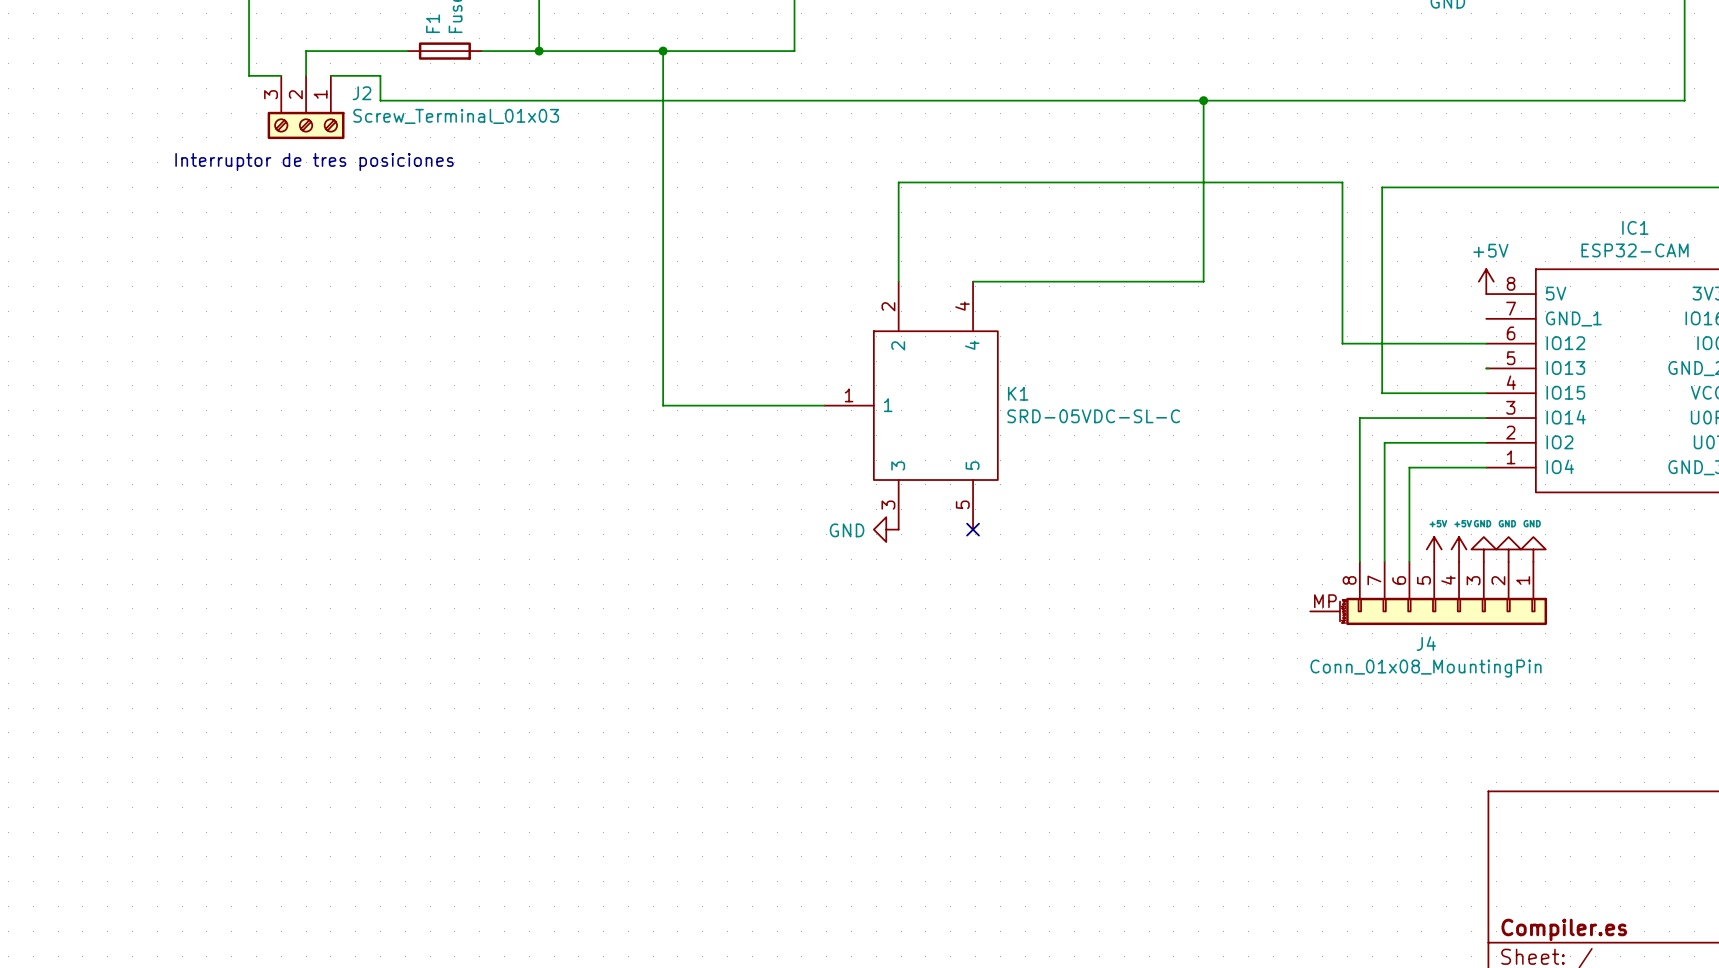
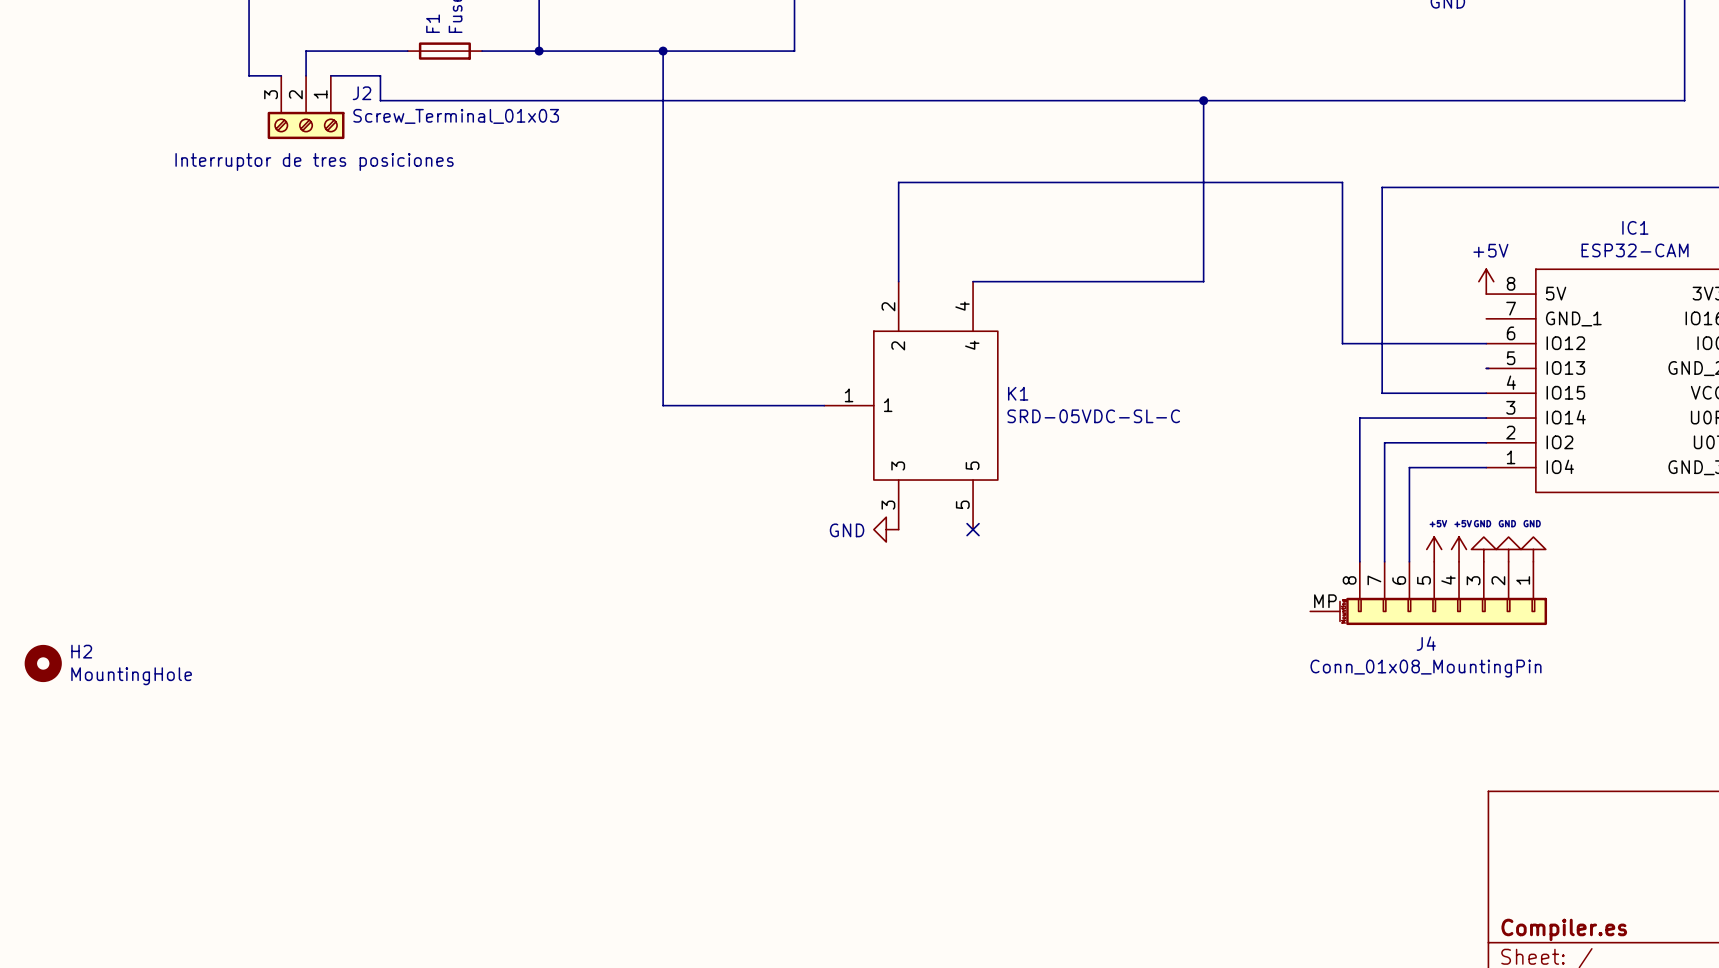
H2: none -> MountingHole (43, 663)

